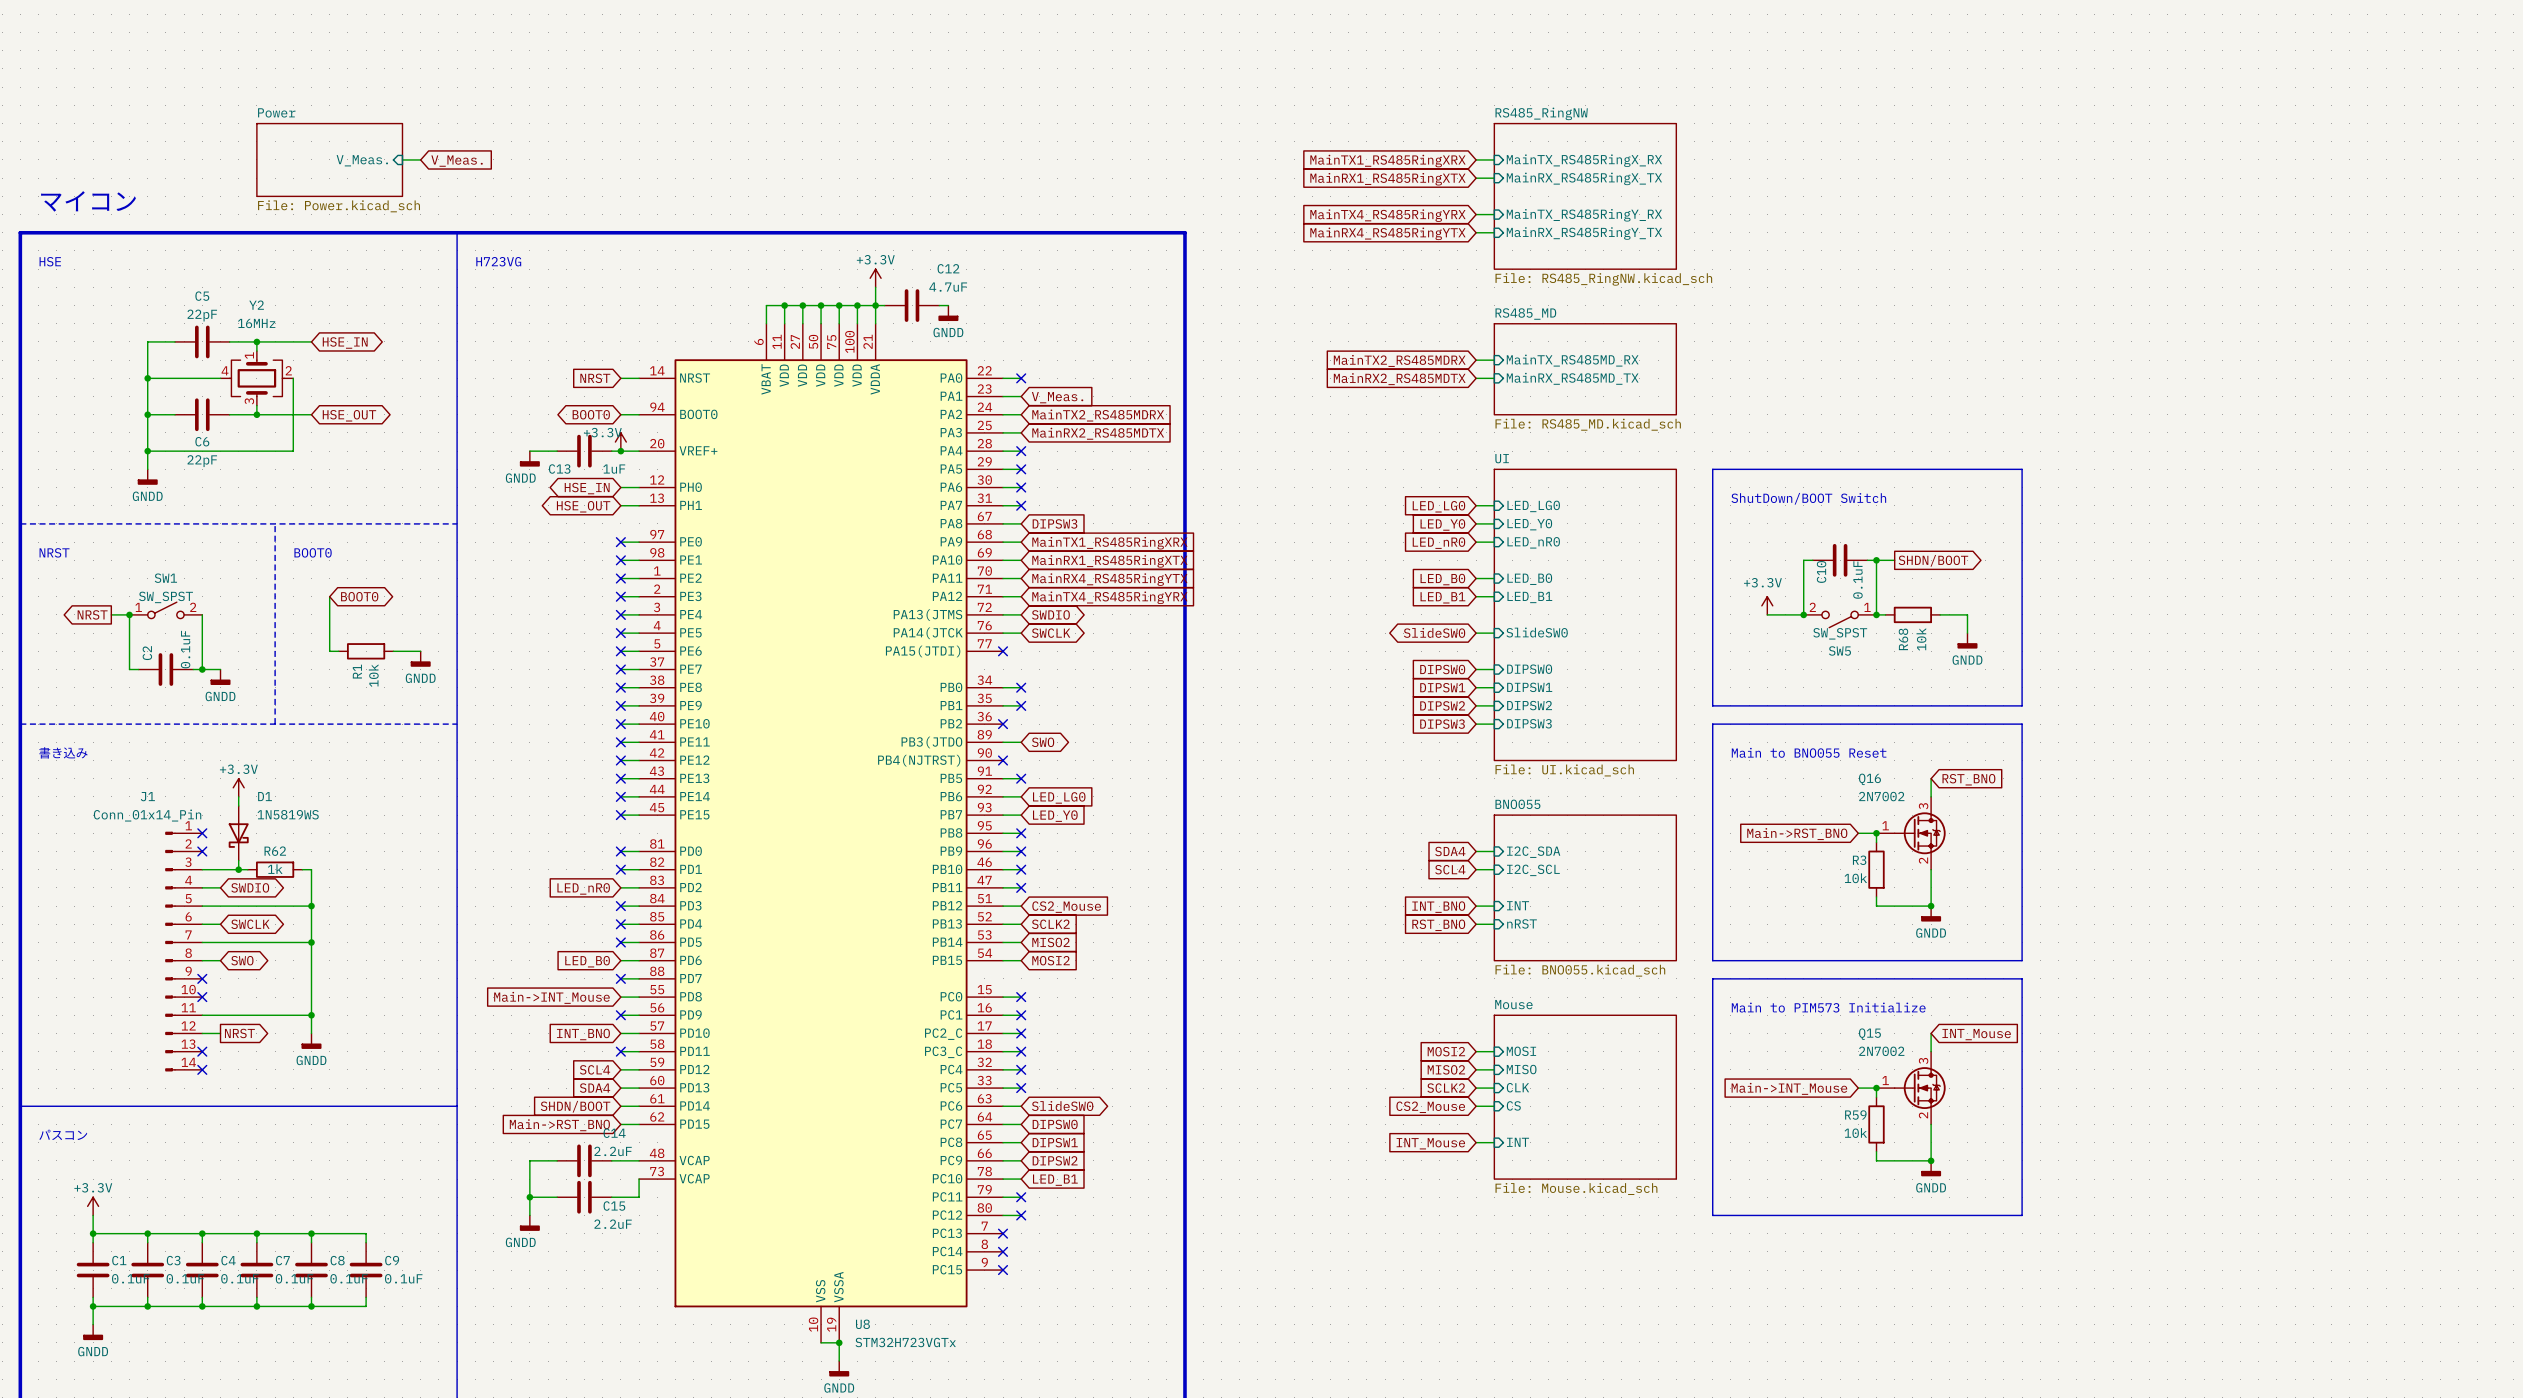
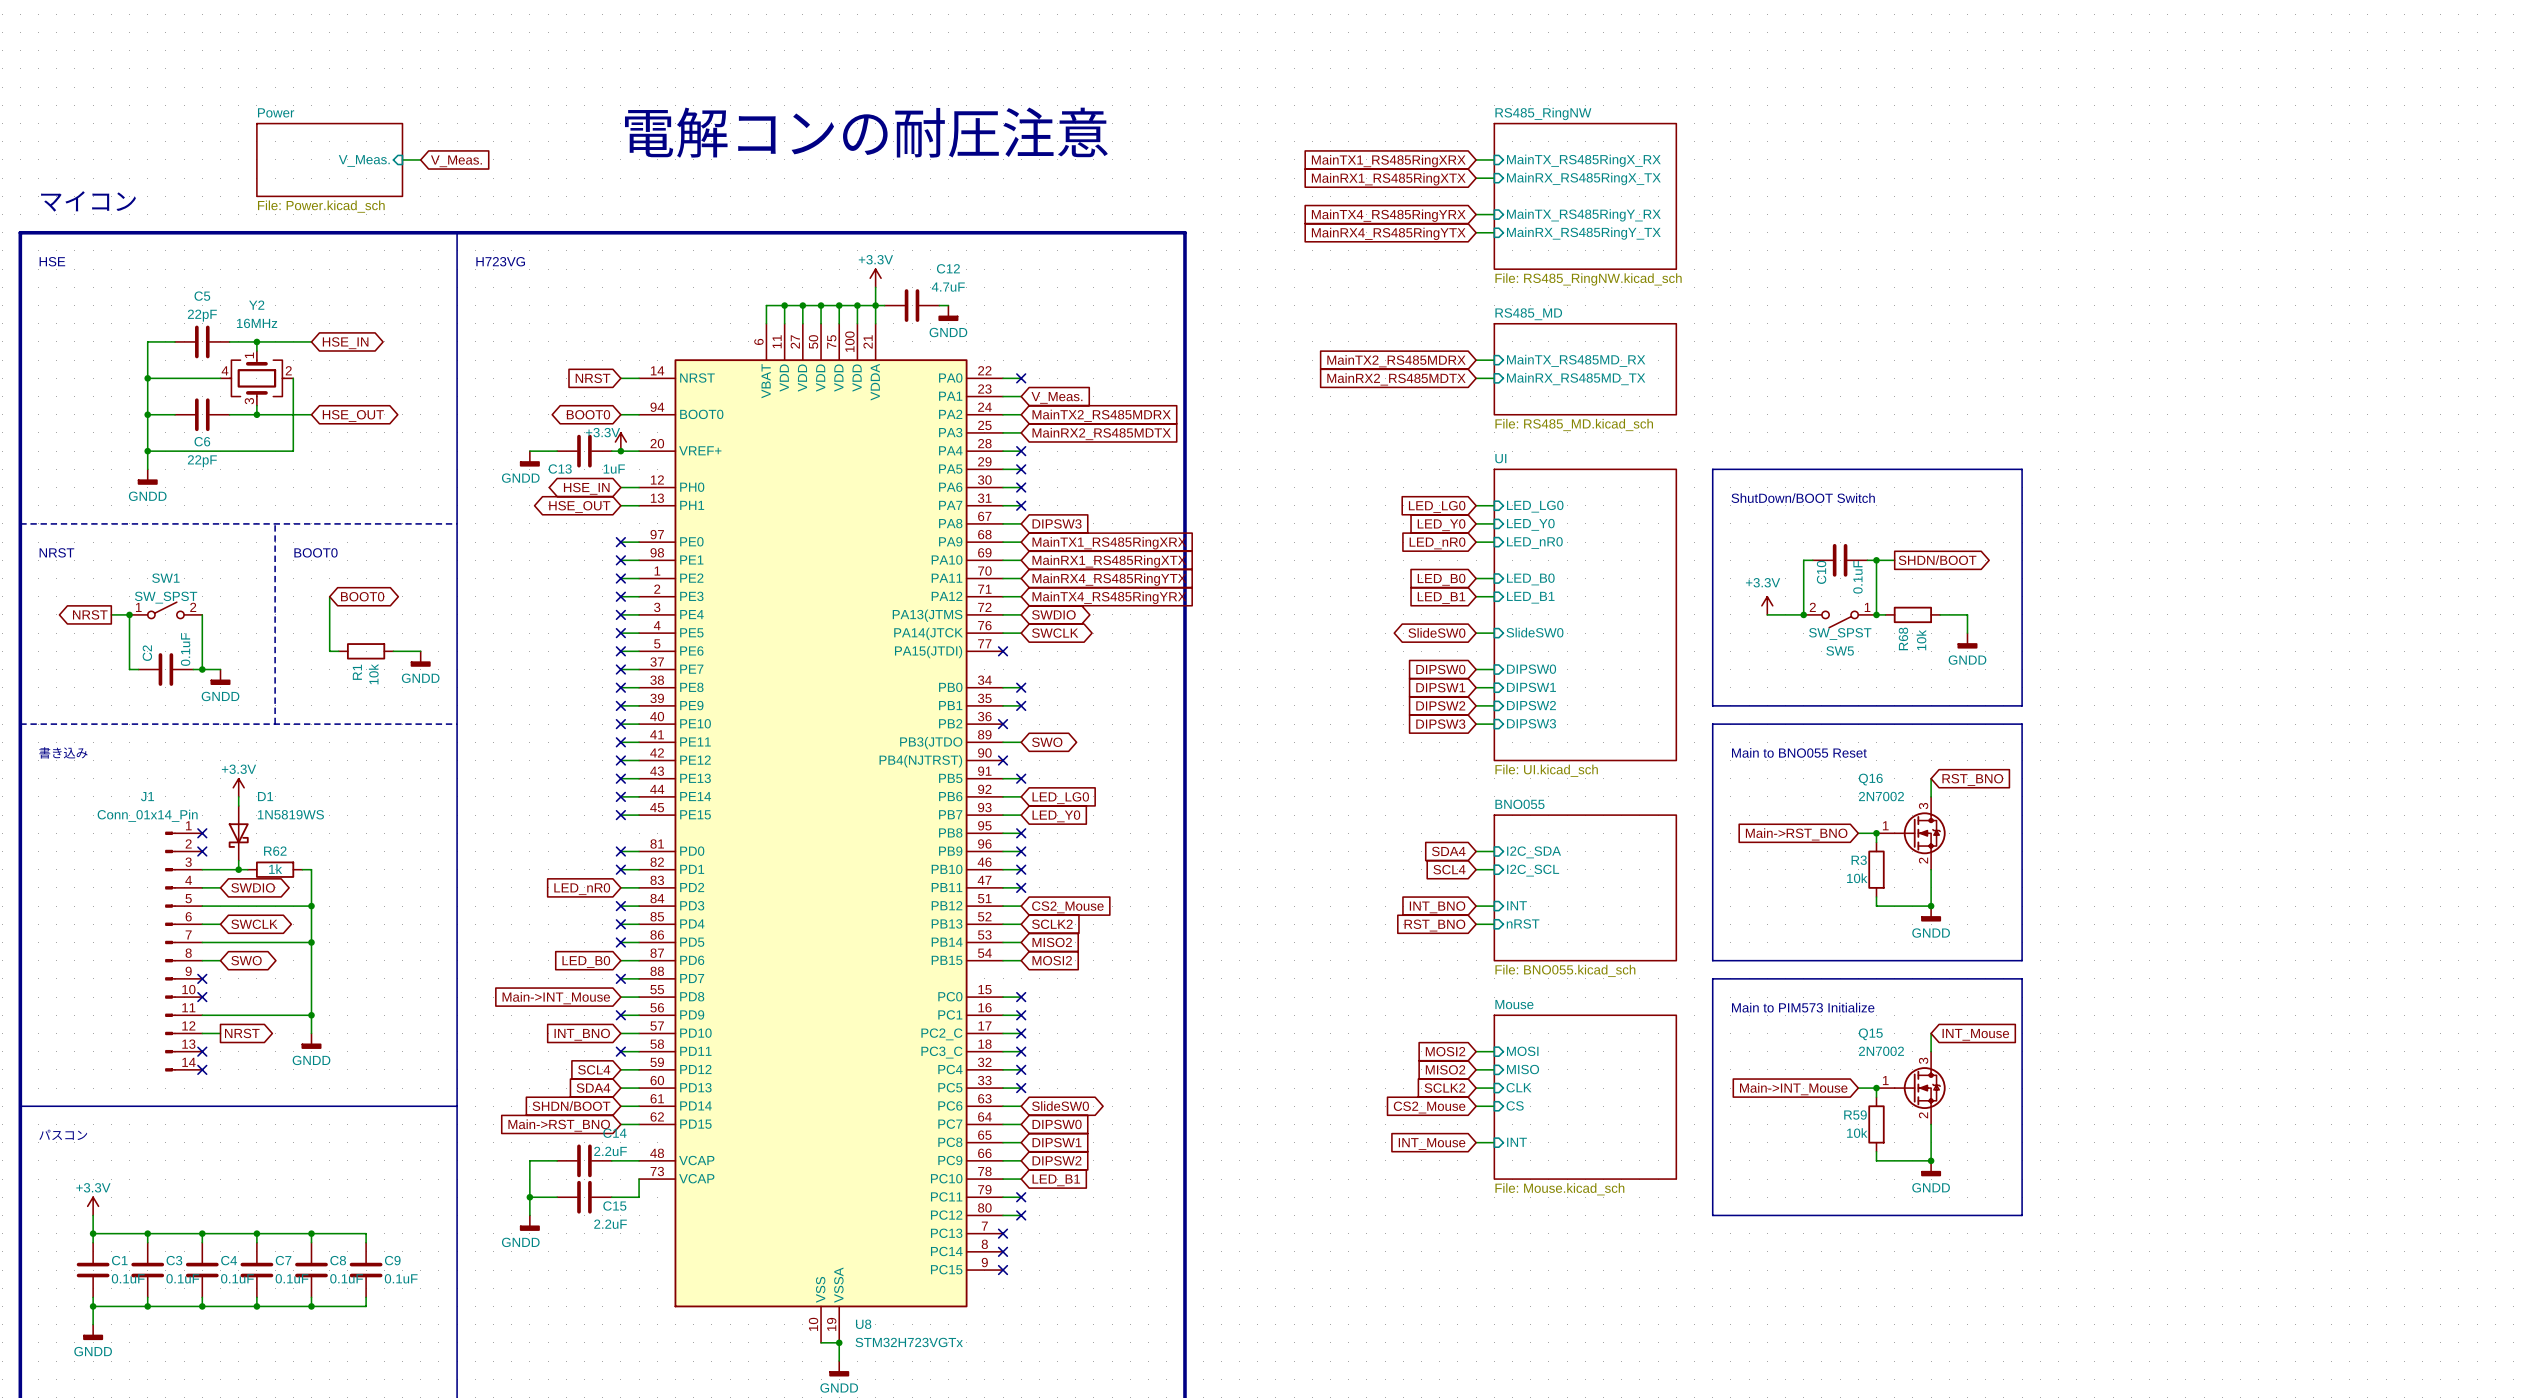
text: none -> 電解コンの耐圧注意 (866, 132)

